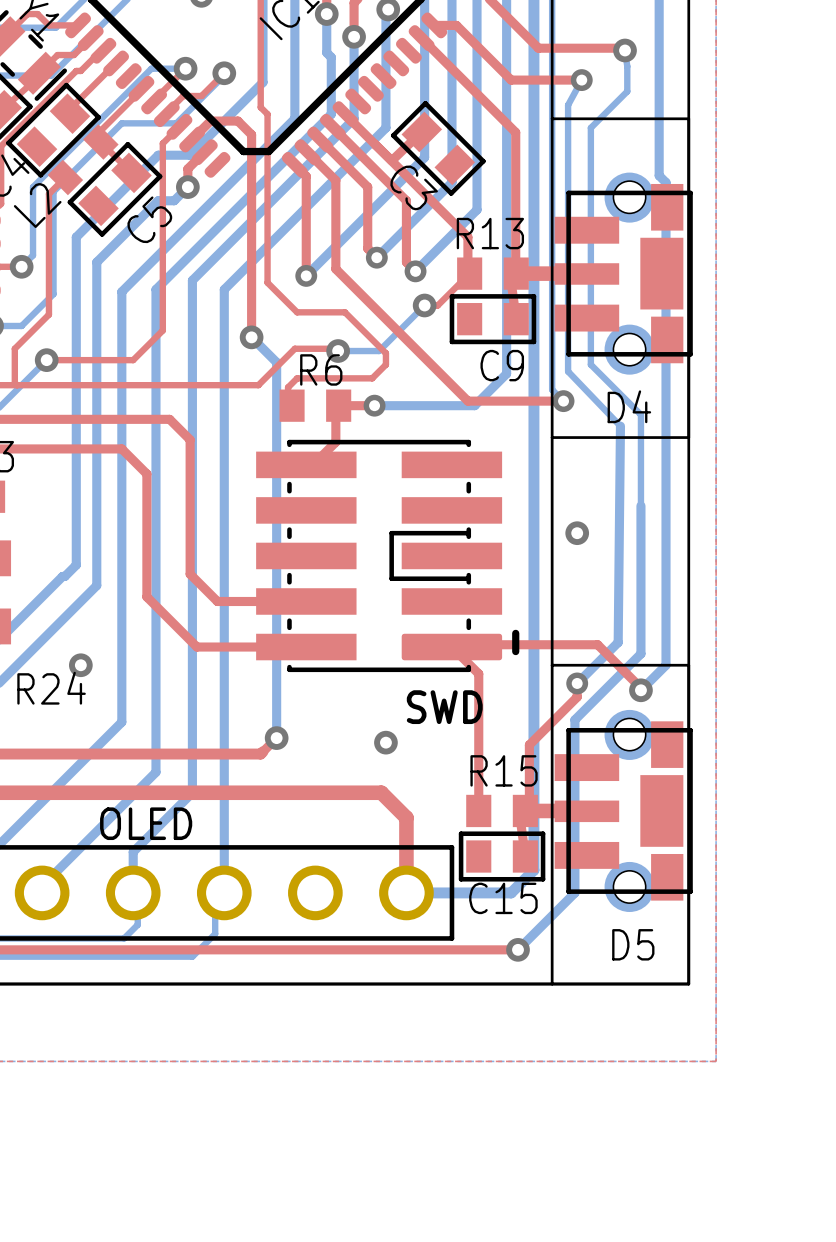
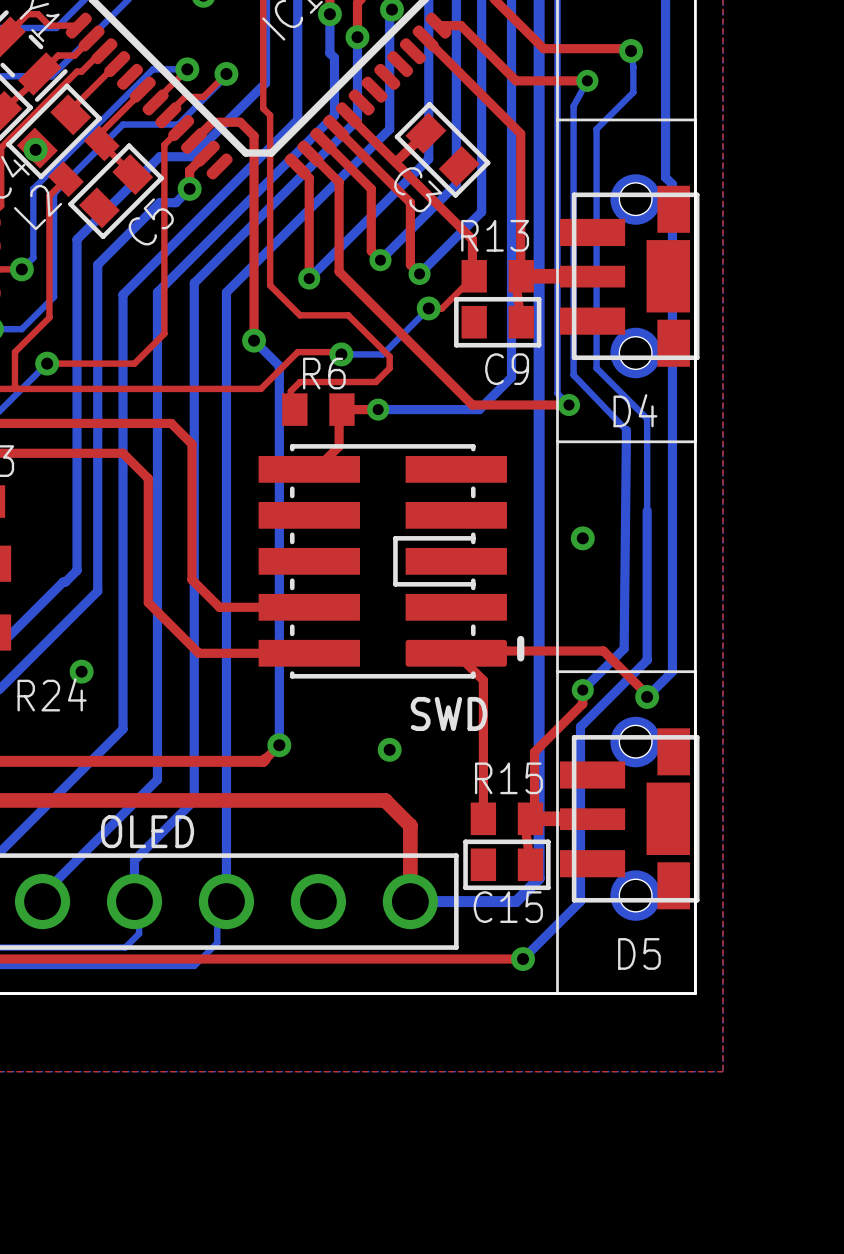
via: none -> (35, 149)

